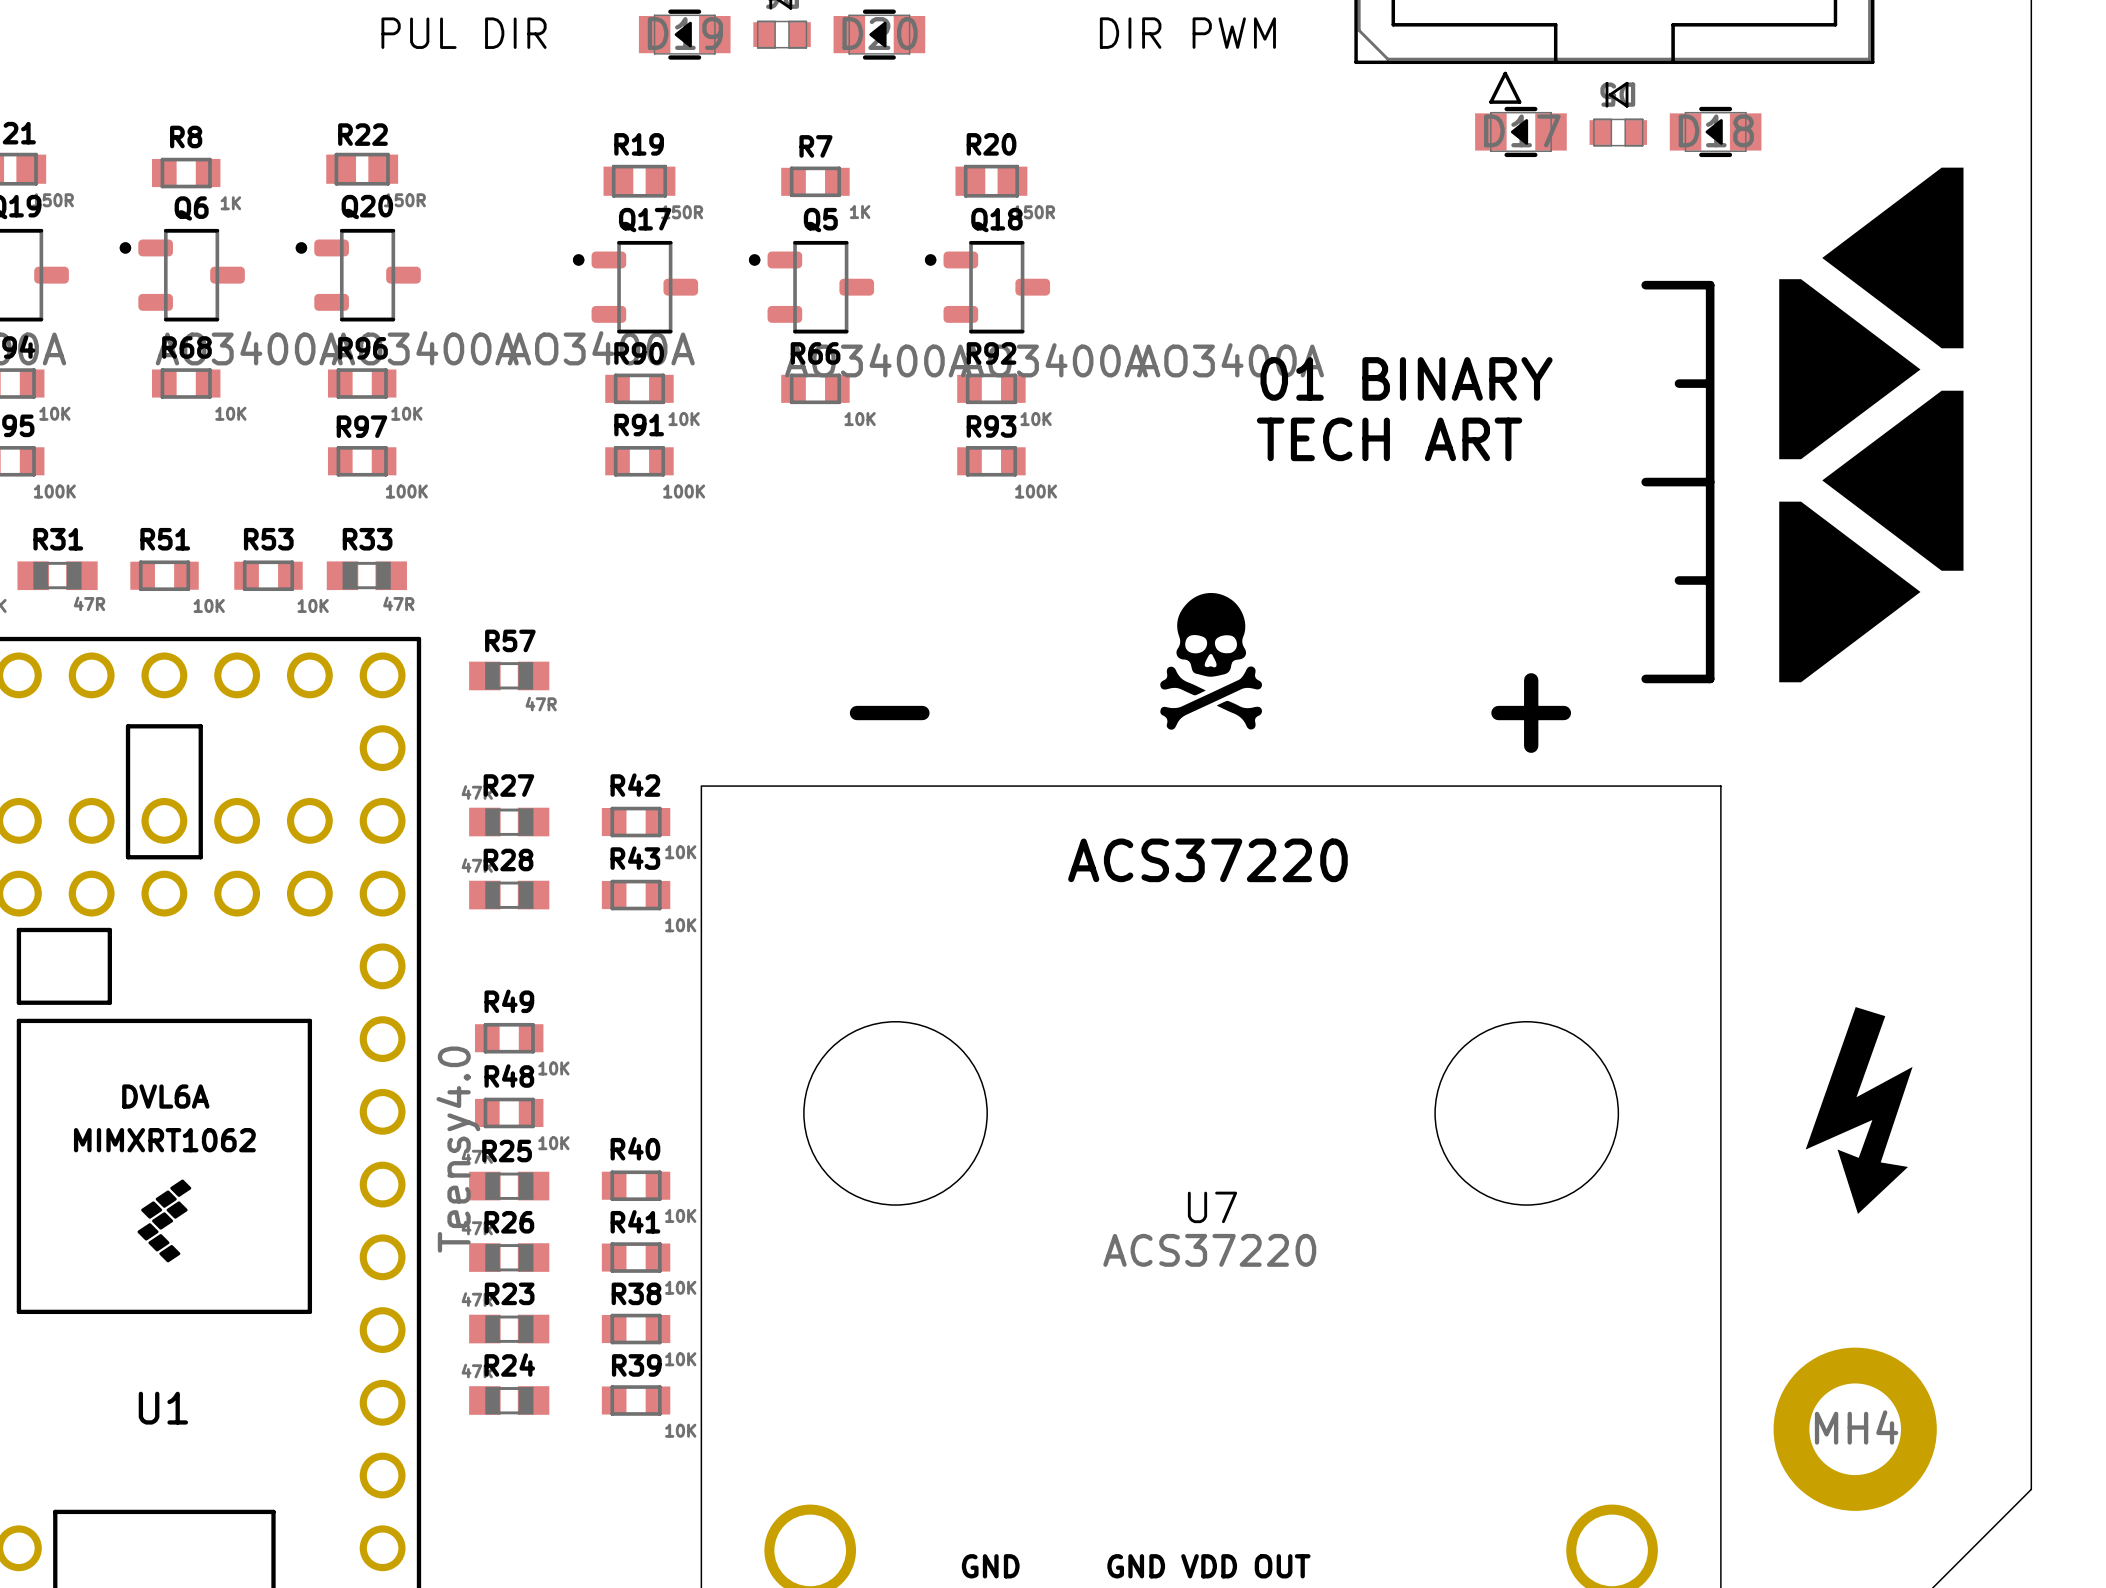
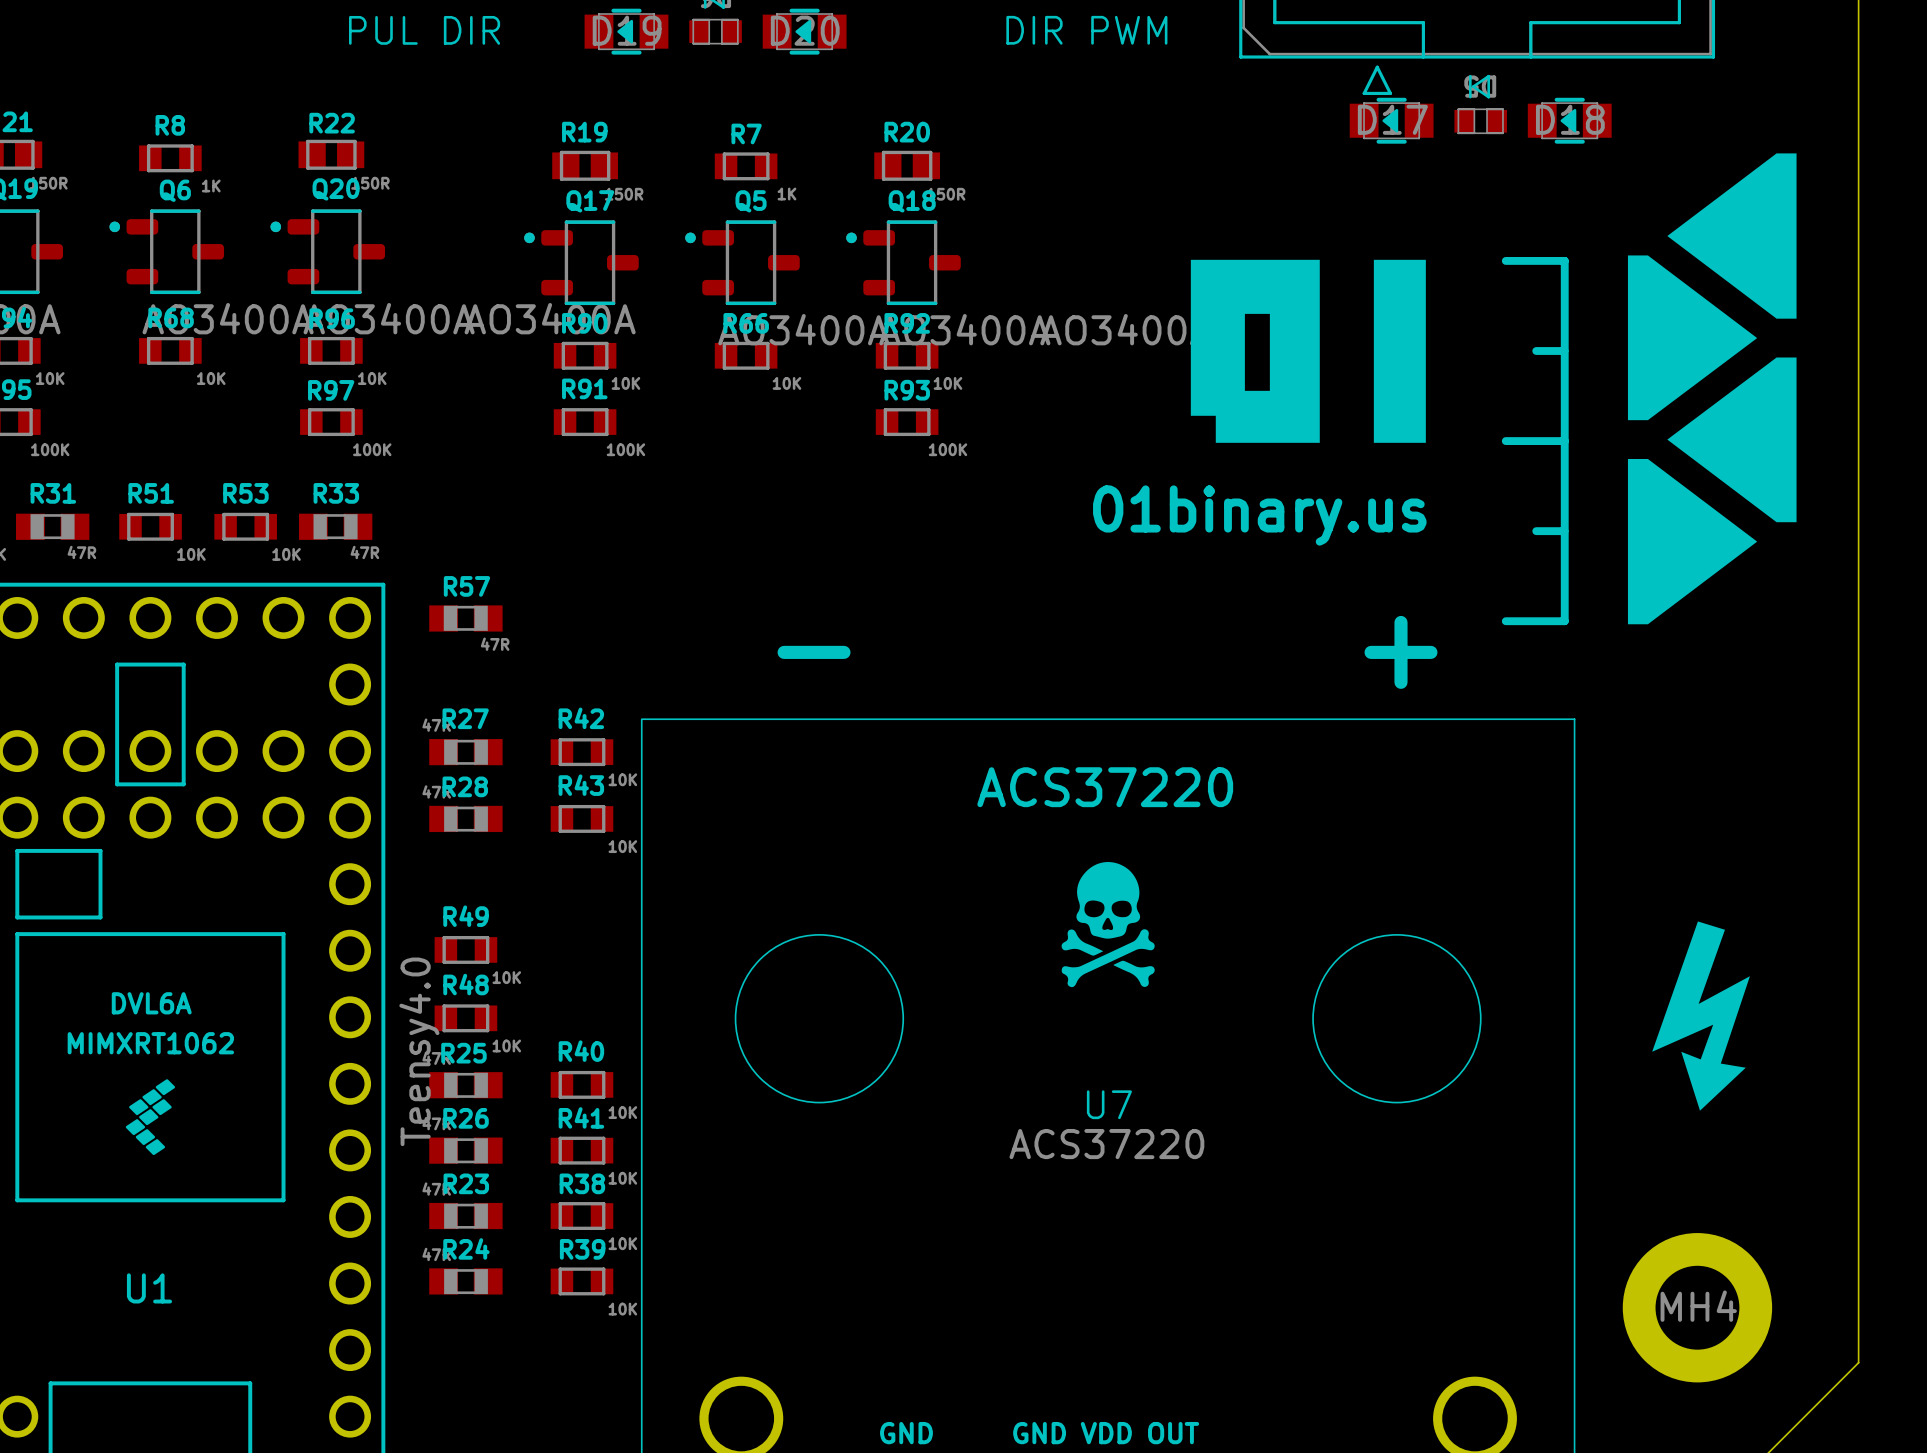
drawing: none -> [1190, 259, 1320, 443]
drawing: none -> [1373, 259, 1426, 443]
text: 01 BINARY (1406, 378) -> none
text: TECH ART (1389, 439) -> none
text: none -> 01binary.us (1259, 515)
drawing position: (1211, 634) -> (1108, 900)
drawing position: (1183, 680) -> (1082, 942)
drawing position: (1211, 698) -> (1108, 958)
drawing position: (1239, 715) -> (1134, 973)

